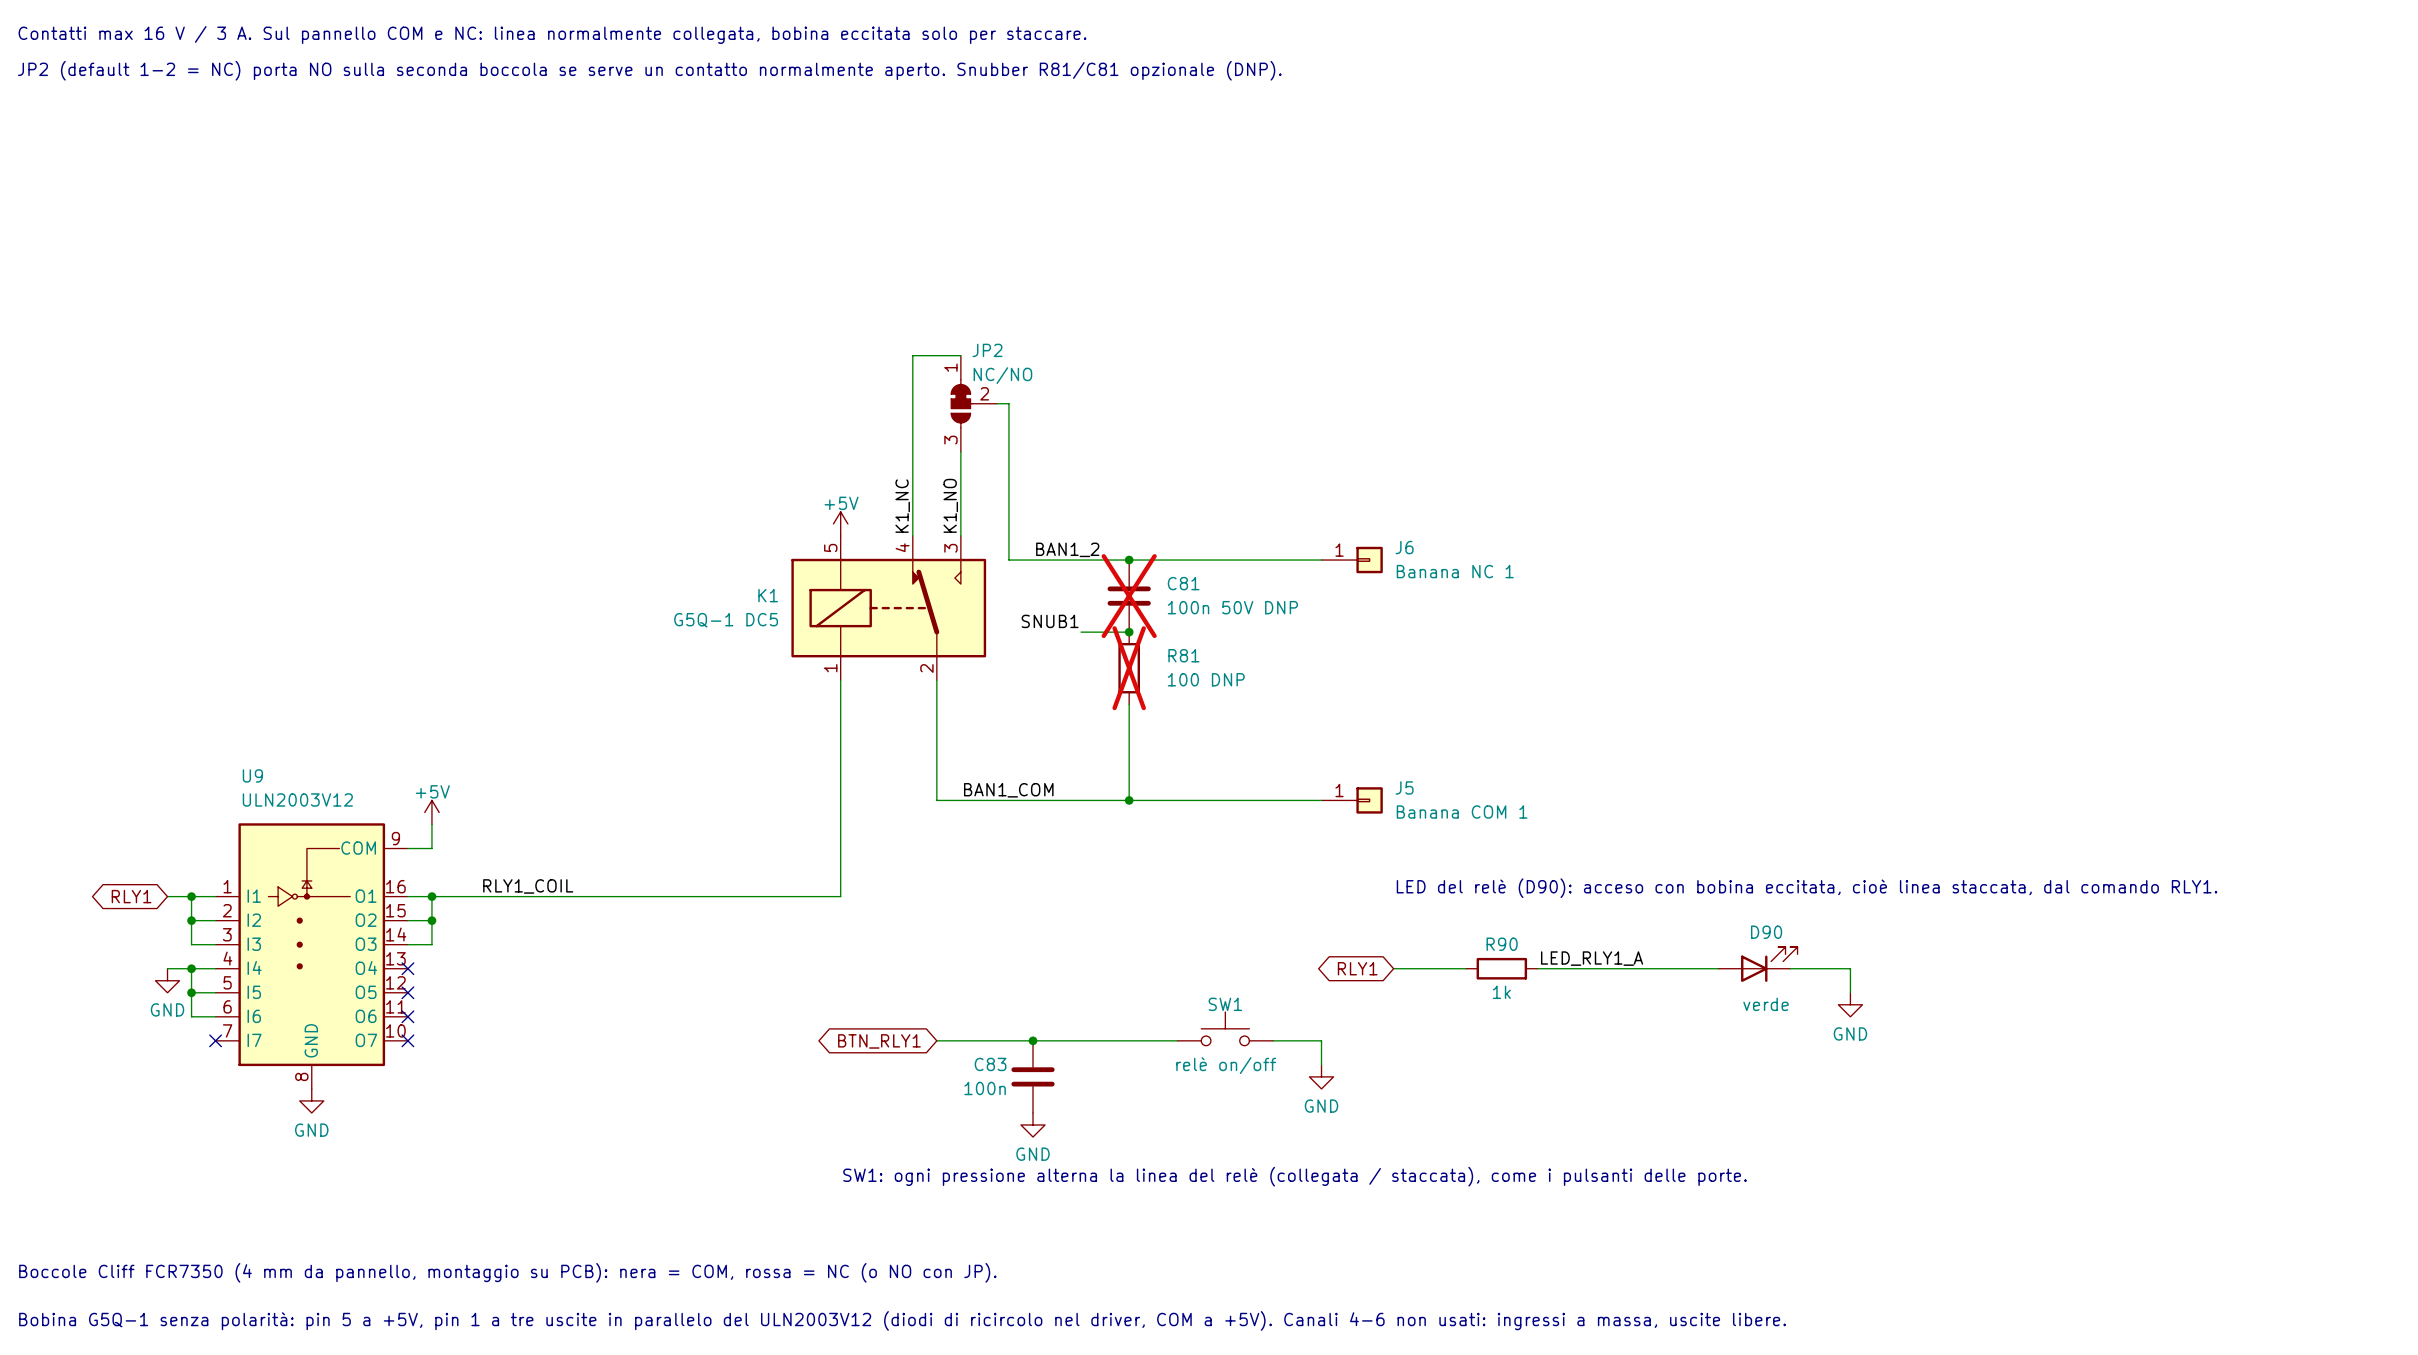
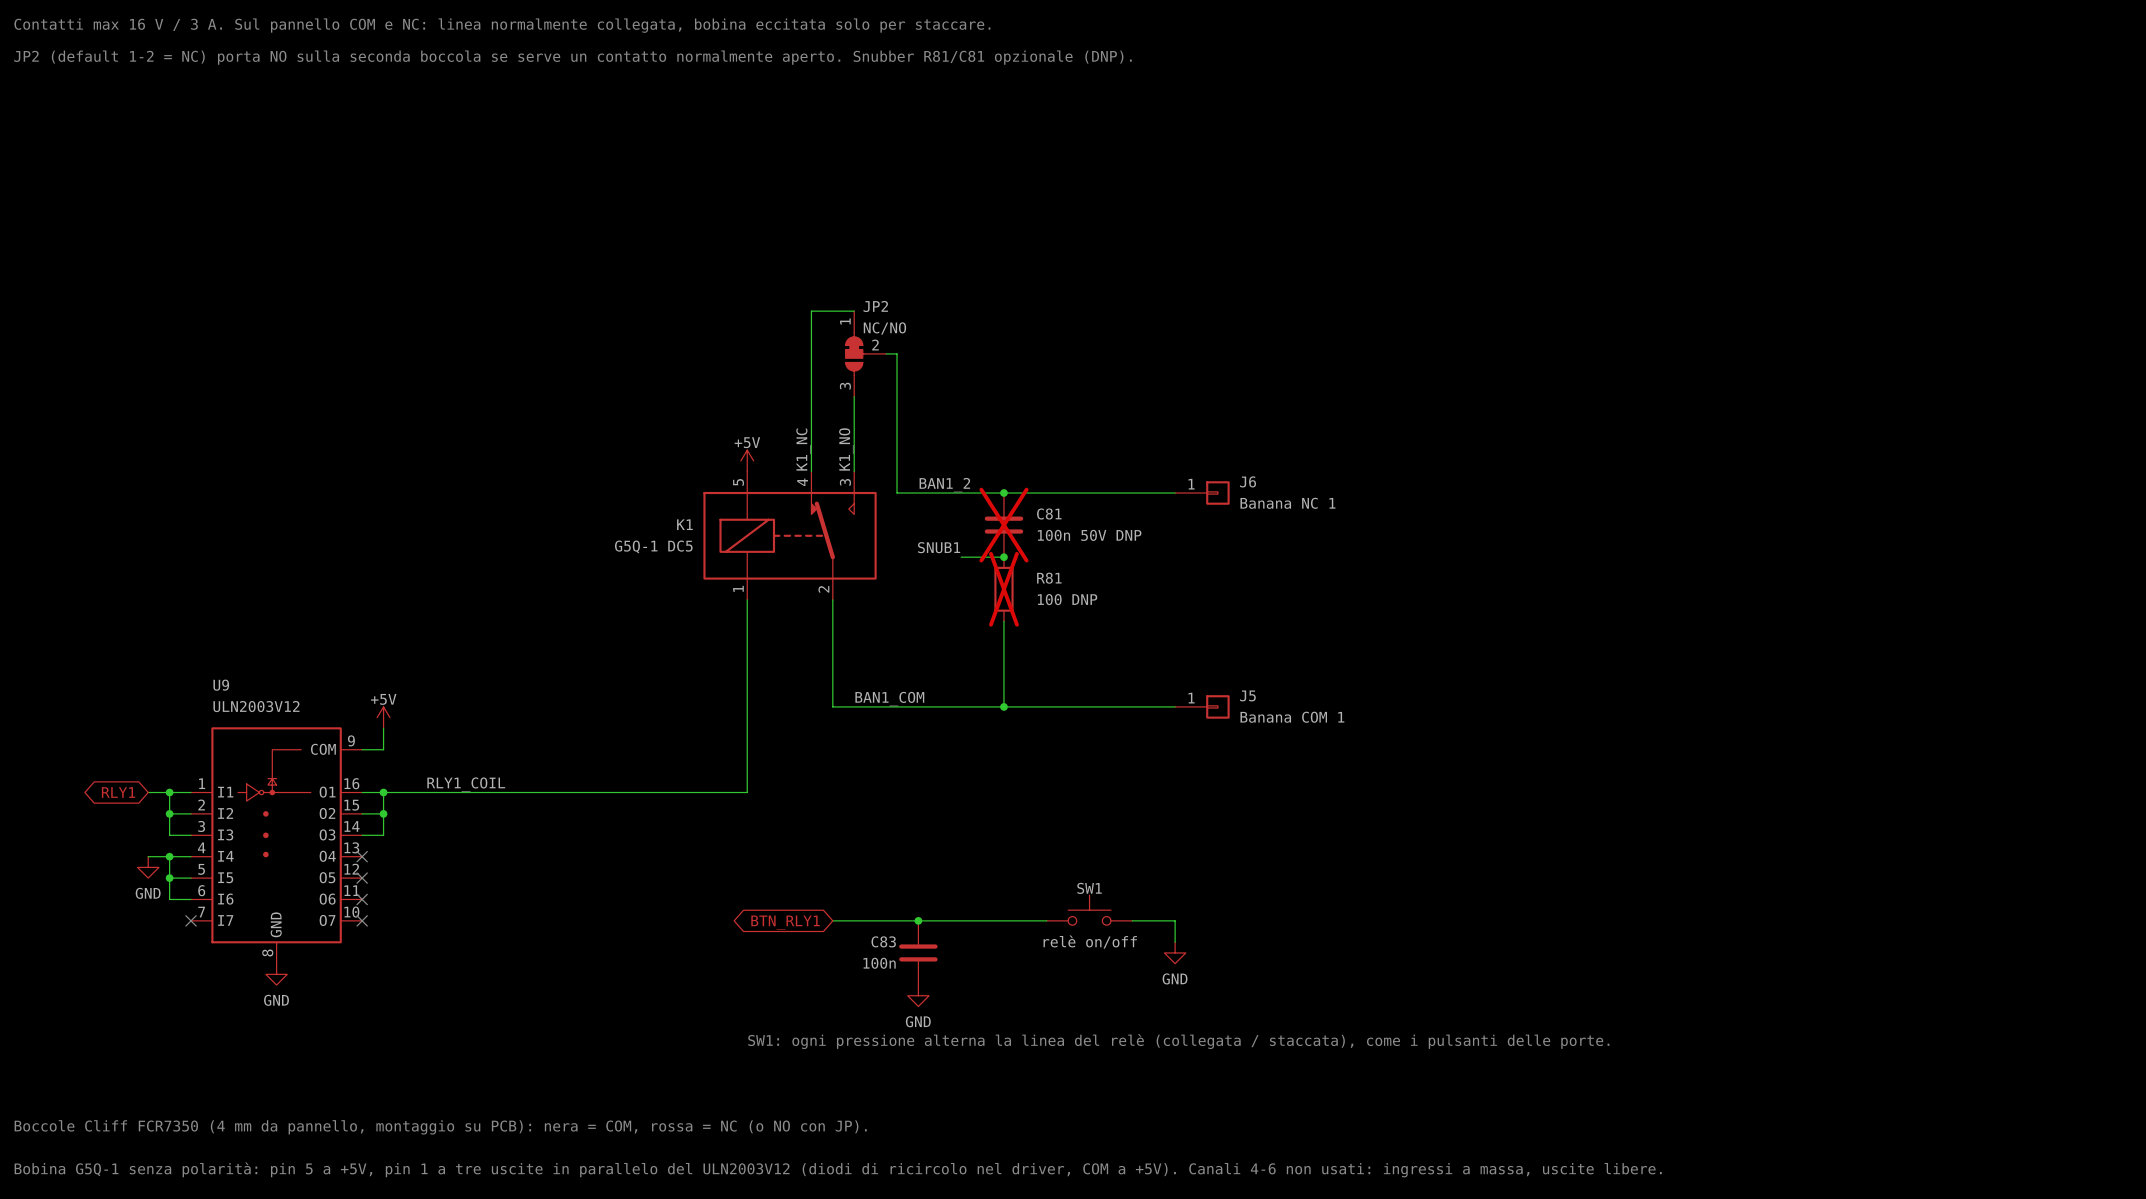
text: LED del relè (D90): acceso con bobina eccitata, cioè linea staccata, dal comando RLY1. (1807, 888) -> none
label: LED_RLY1_A (1592, 958) -> none
D90: verde (1757, 964) -> none
global label: RLY1 (1357, 968) -> none
wire: (1393, 968) (1465, 968) -> none
R90: 1k (1501, 968) -> none
wire: (1537, 968) (1718, 968) -> none
wire: (1790, 968) (1850, 968) (1850, 992) -> none
power symbol: GND (1850, 1004) -> none

